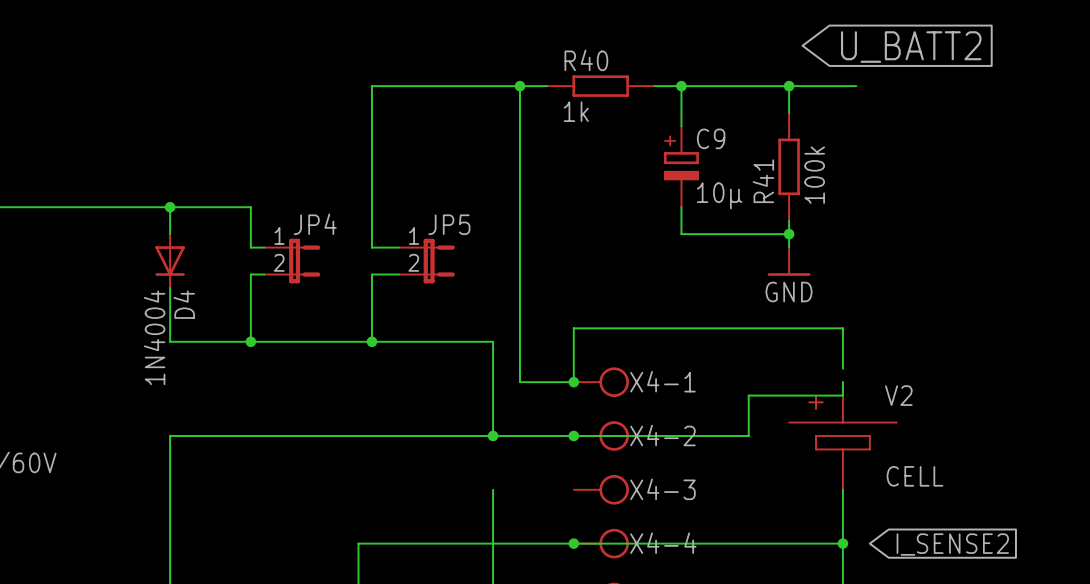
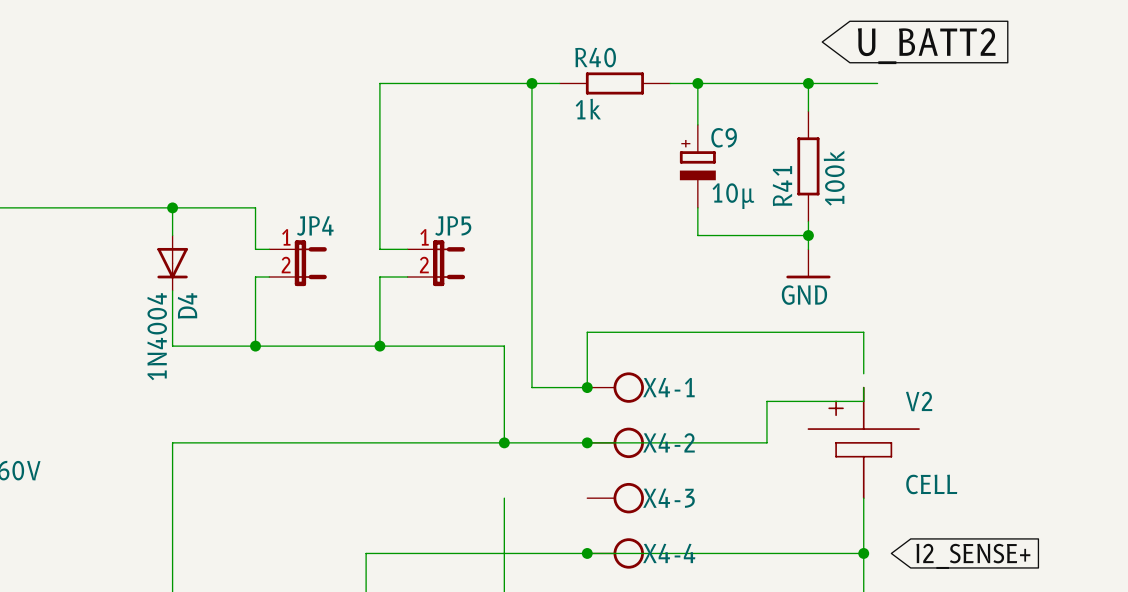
global label: I_SENSE2 (952, 544) -> I2_SENSE+ (973, 556)

